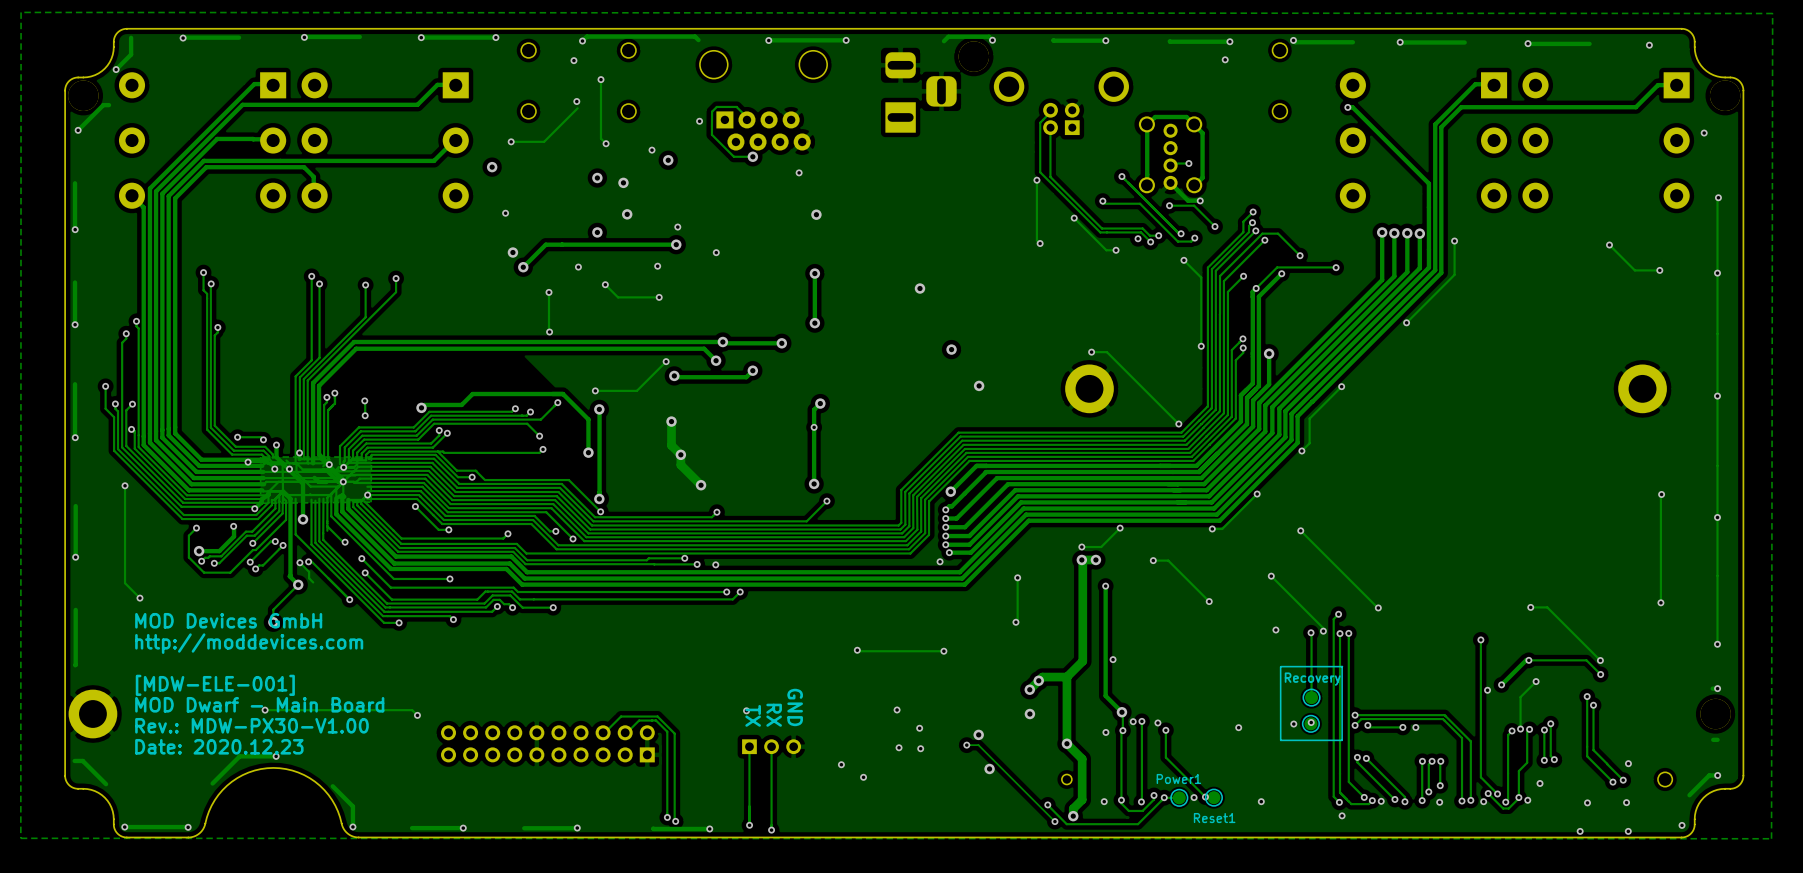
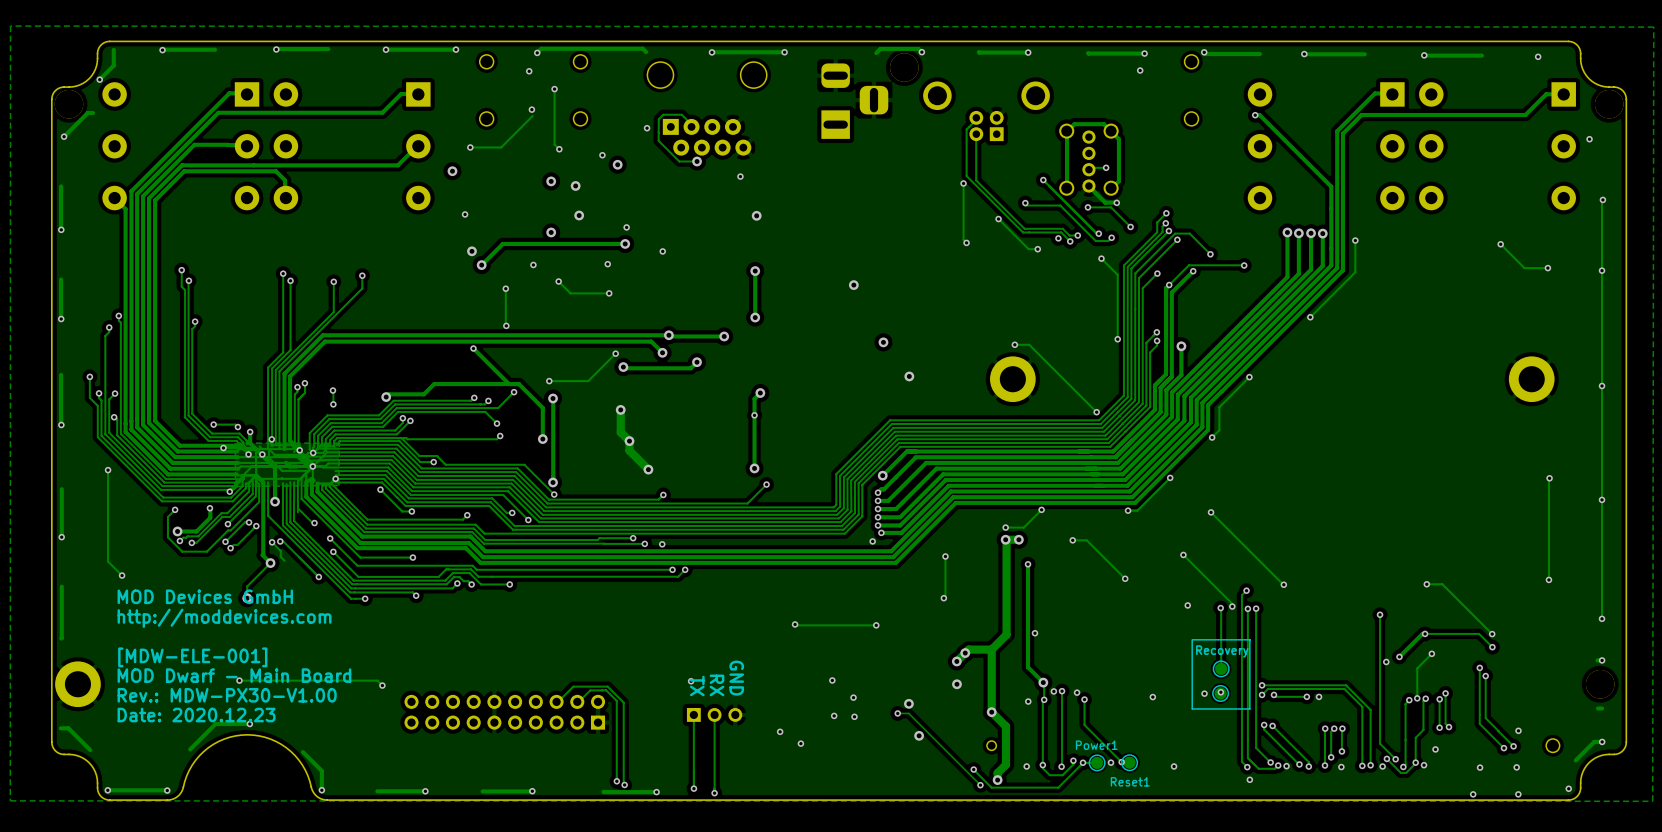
track: none -> (473, 348) (509, 384)
via: none -> (473, 348)

